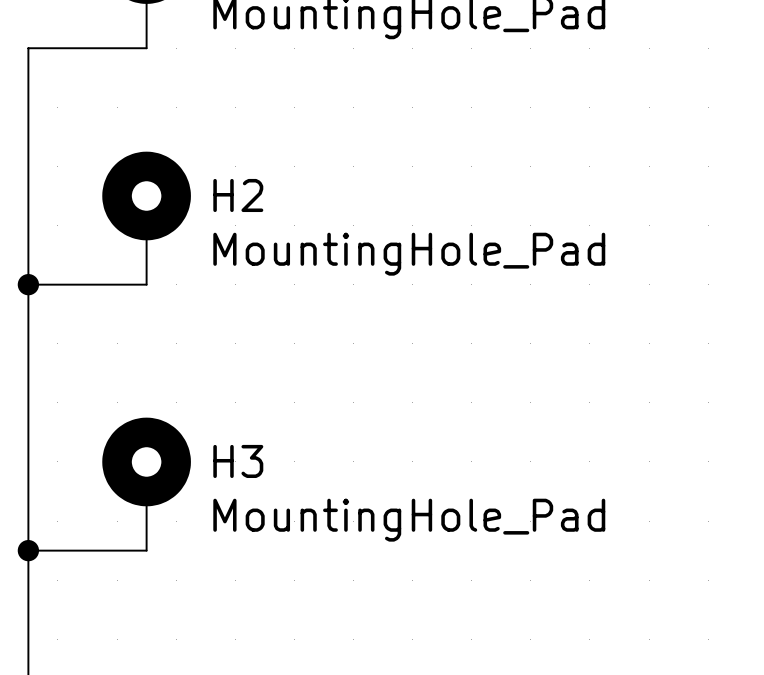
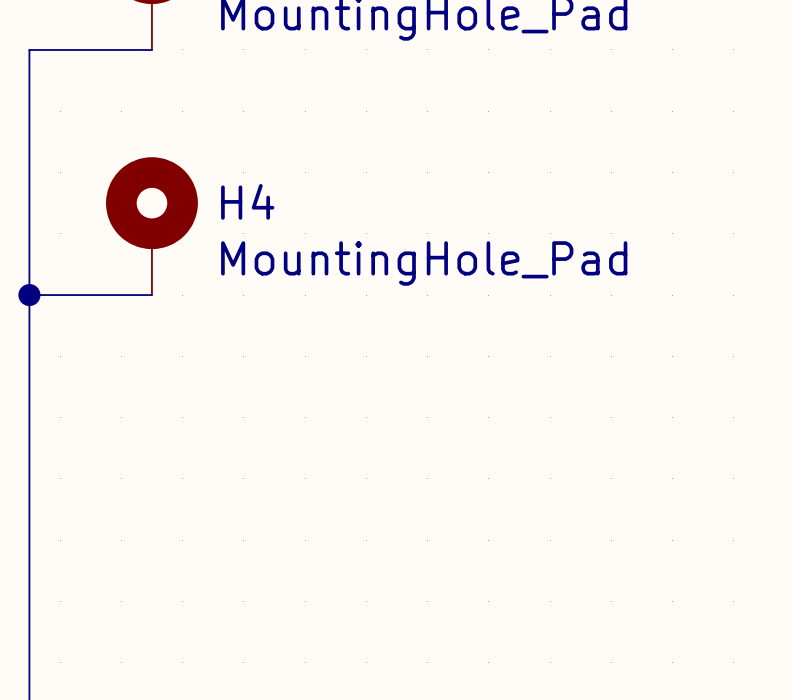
H2 name: H2 (238, 195) -> H4 (247, 201)
H3: MountingHole_Pad (146, 484) -> none
wire: (28, 550) (146, 550) -> none
junction: (28, 550) -> none

